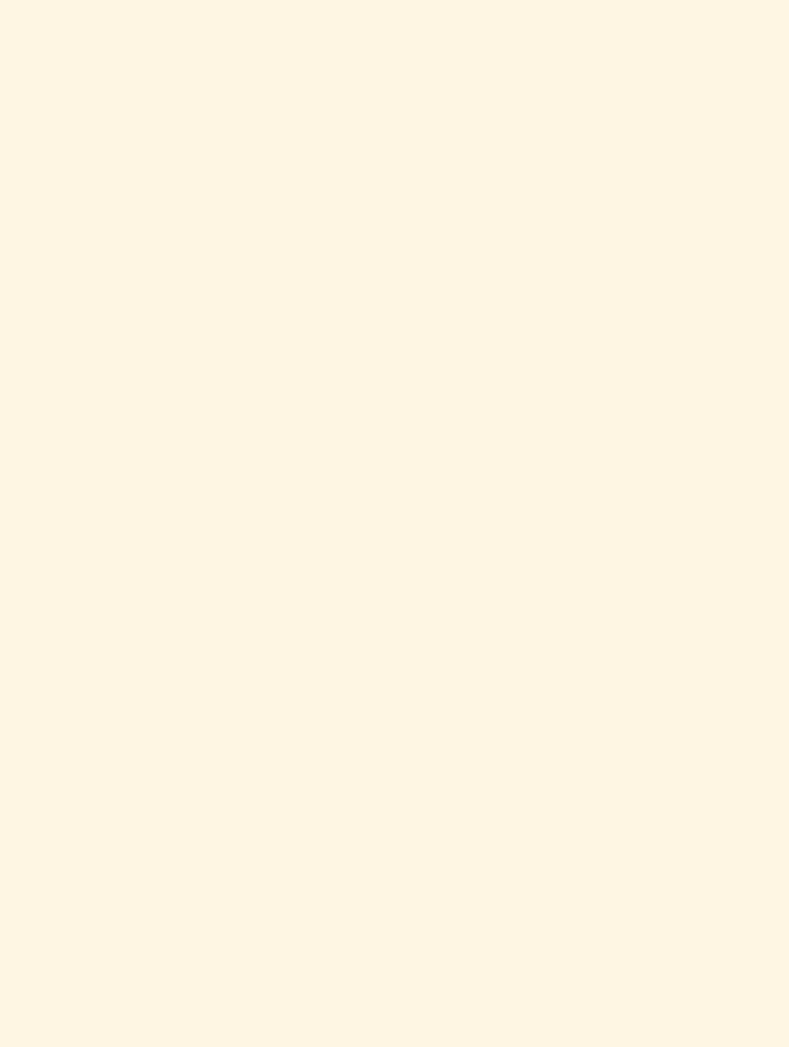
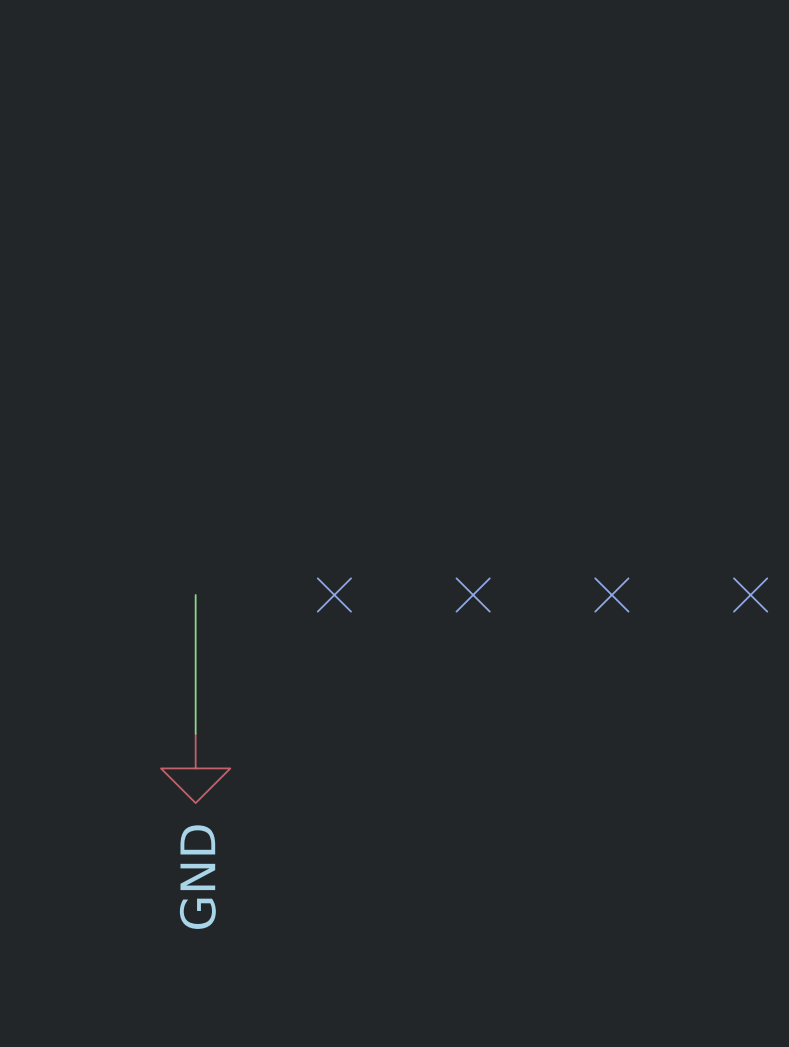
wire: none -> (195, 594) (195, 733)
no-connect mark: none -> (334, 594)
no-connect mark: none -> (473, 594)
no-connect mark: none -> (611, 594)
no-connect mark: none -> (750, 594)
power symbol: none -> GND (195, 768)

